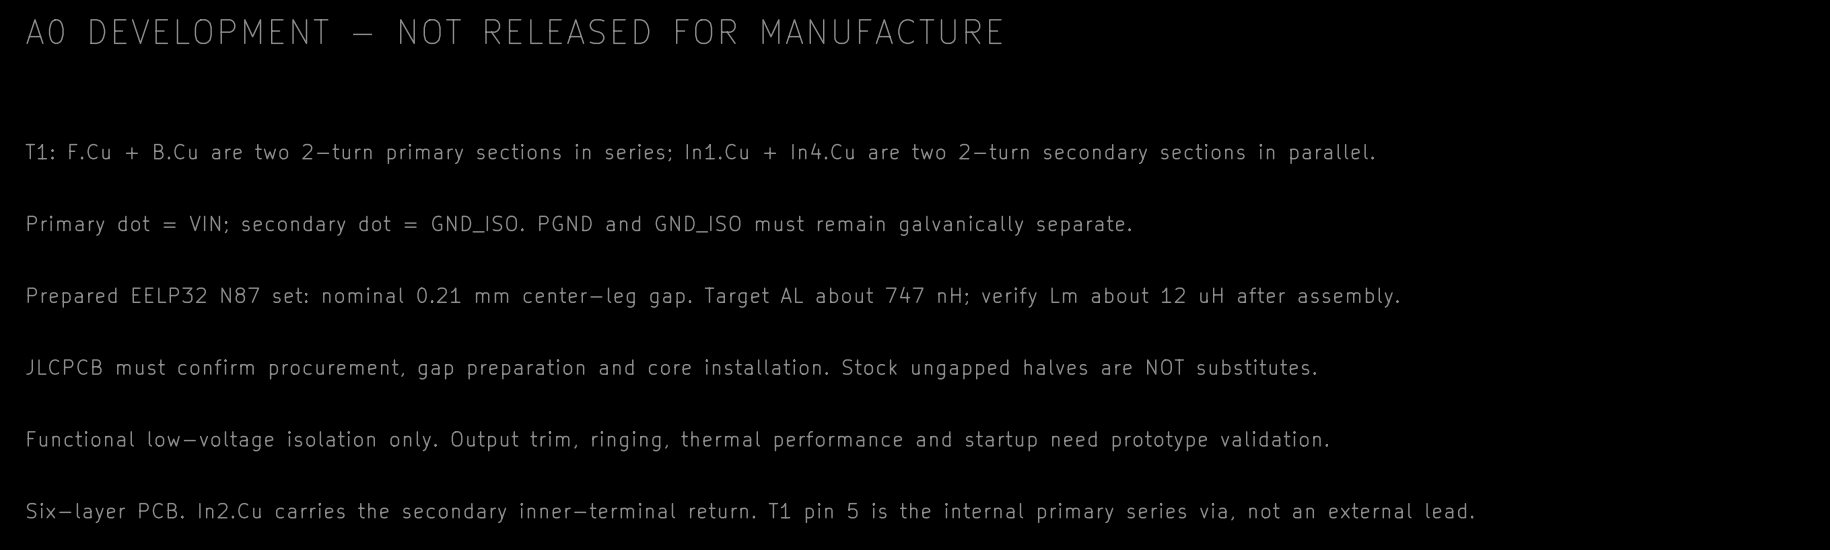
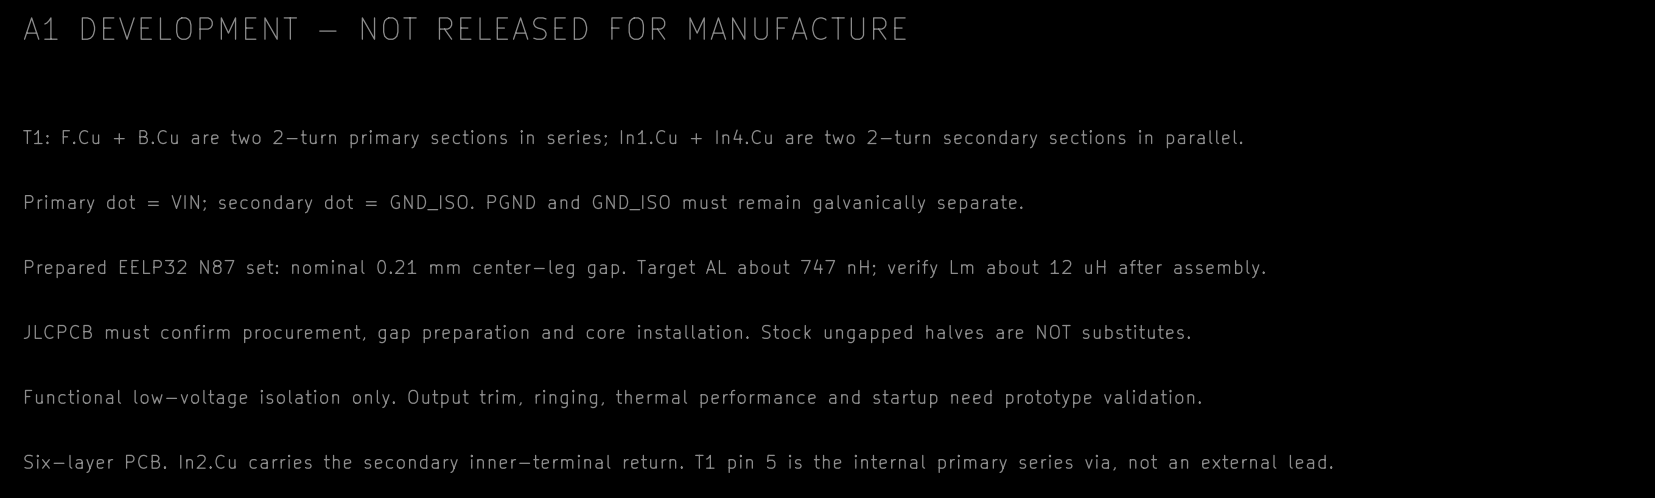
text: A0 DEVELOPMENT - NOT RELEASED FOR MANUFACTURE (514, 31) -> A1 DEVELOPMENT - NOT RELEASED FOR MANUFACTURE (464, 28)

